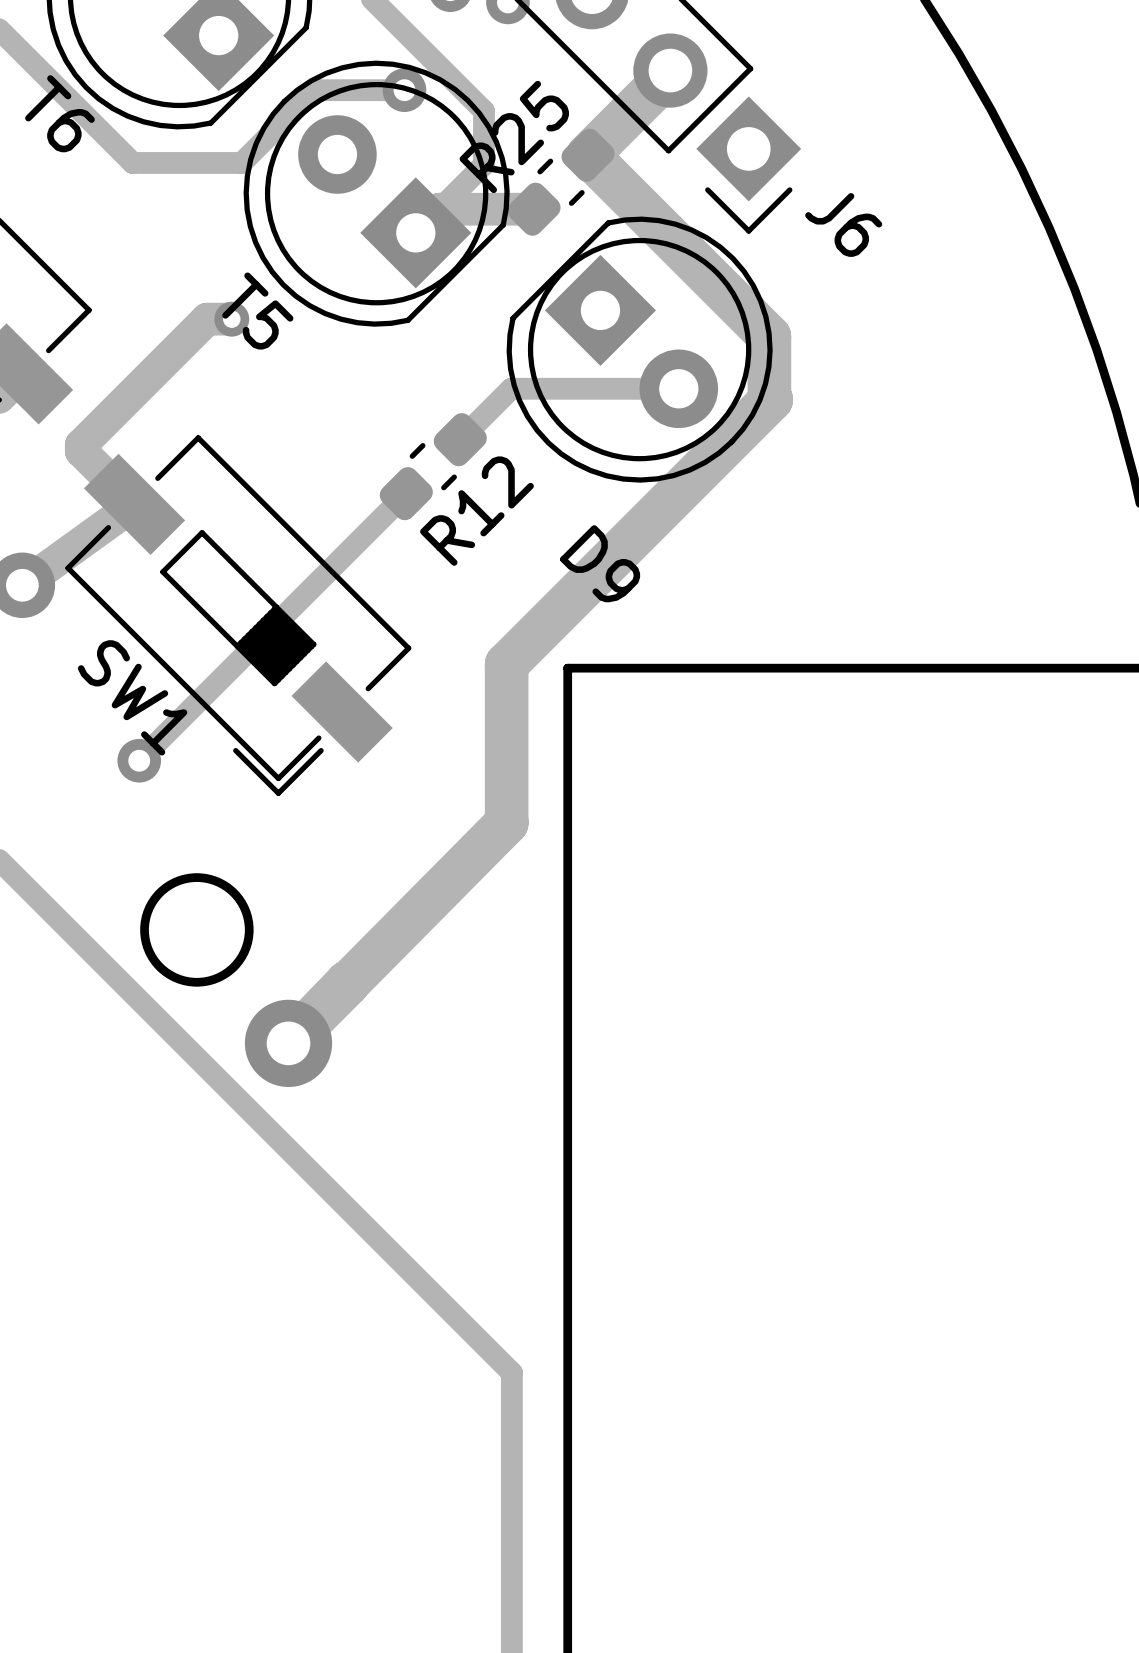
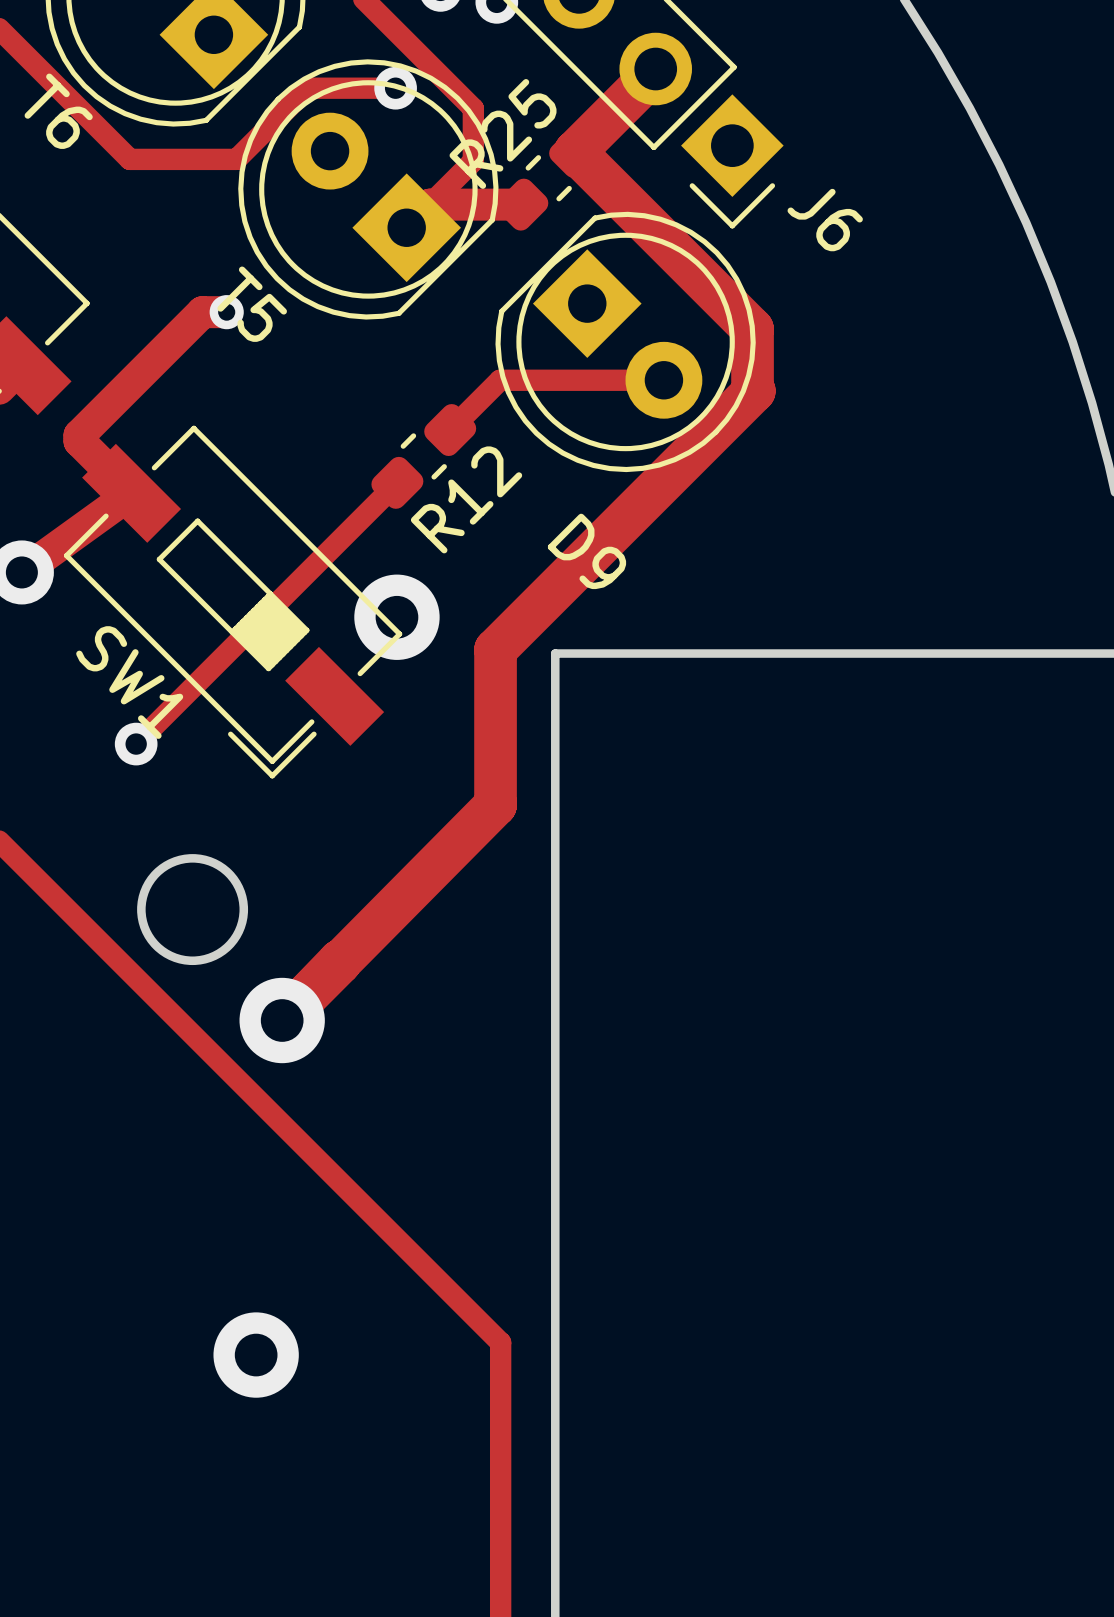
via: none -> (396, 617)
via: none -> (256, 1355)

